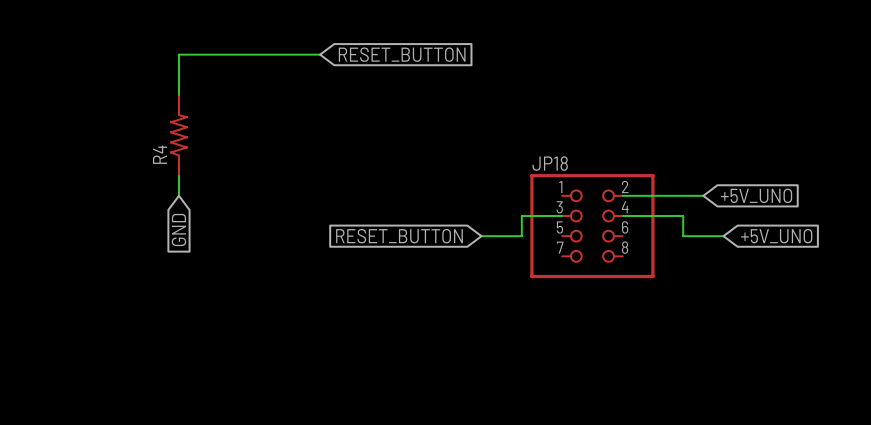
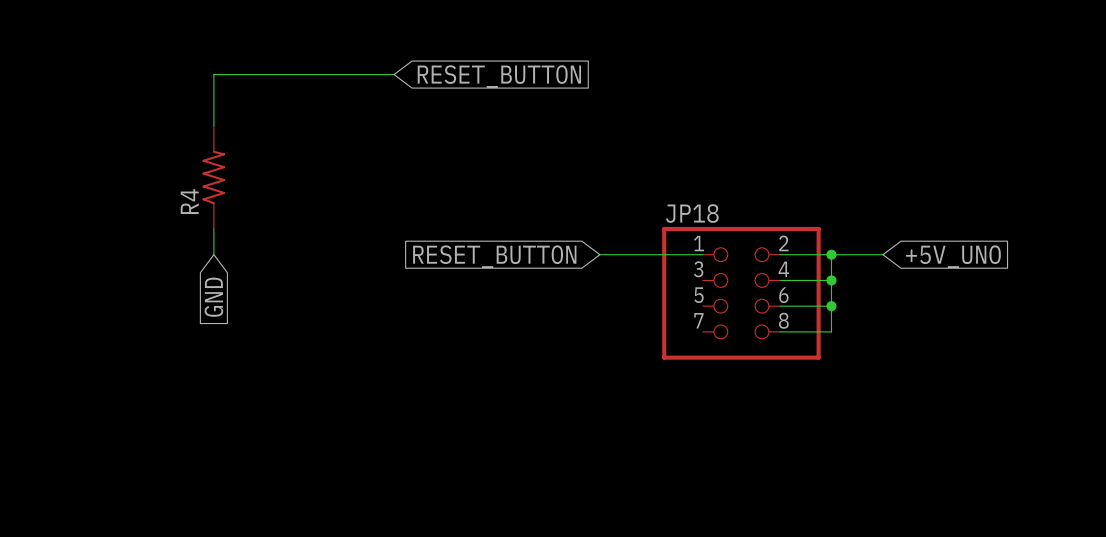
wire: none -> (599, 254) (702, 254)
wire: none -> (831, 254) (831, 331) (780, 331)
junction: none -> (831, 254)
wire: (562, 216) (521, 216) (521, 236) (481, 236) -> none
wire: (663, 216) (683, 216) (683, 236) (723, 236) -> none
junction: none -> (831, 280)
global label position: RESET_BUTTON (399, 236) -> RESET_BUTTON (494, 256)
wire: none -> (780, 306) (831, 306)
junction: none -> (831, 306)
global label: +5V_UNO (776, 236) -> none

